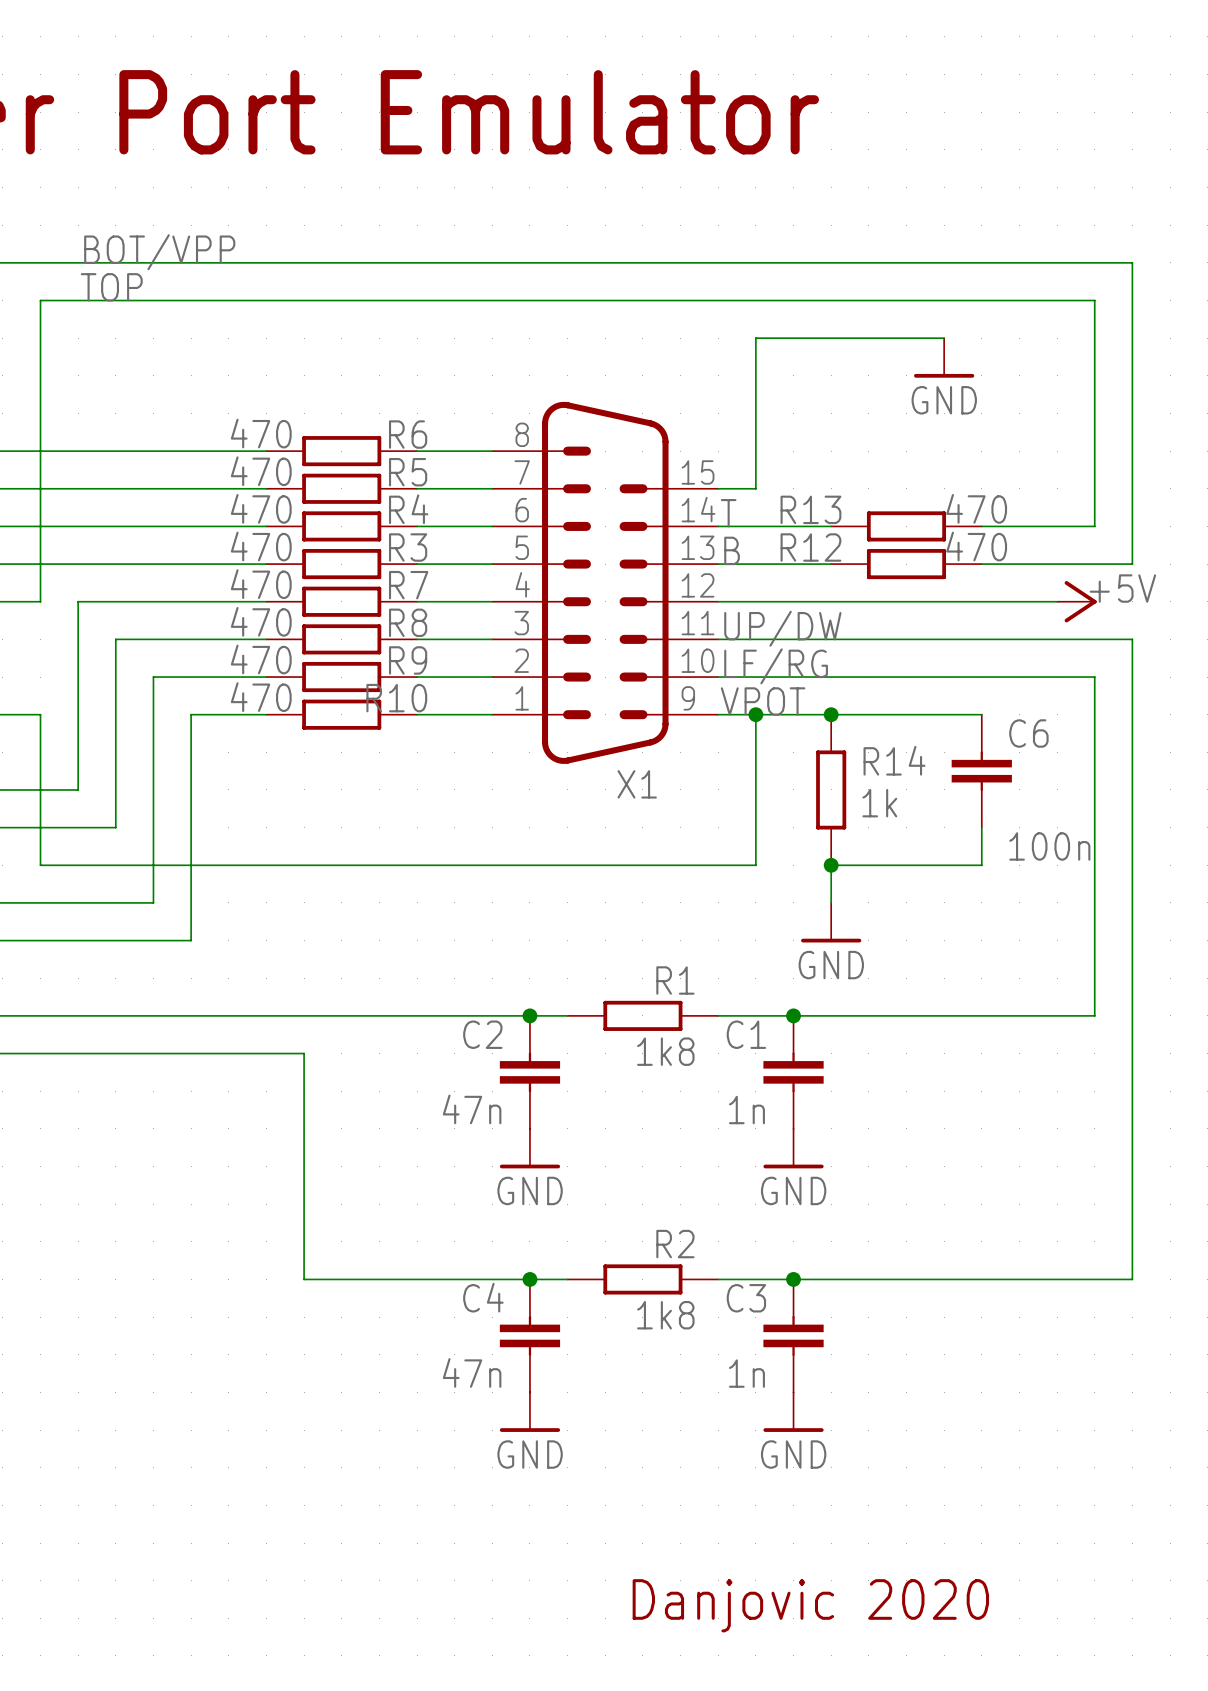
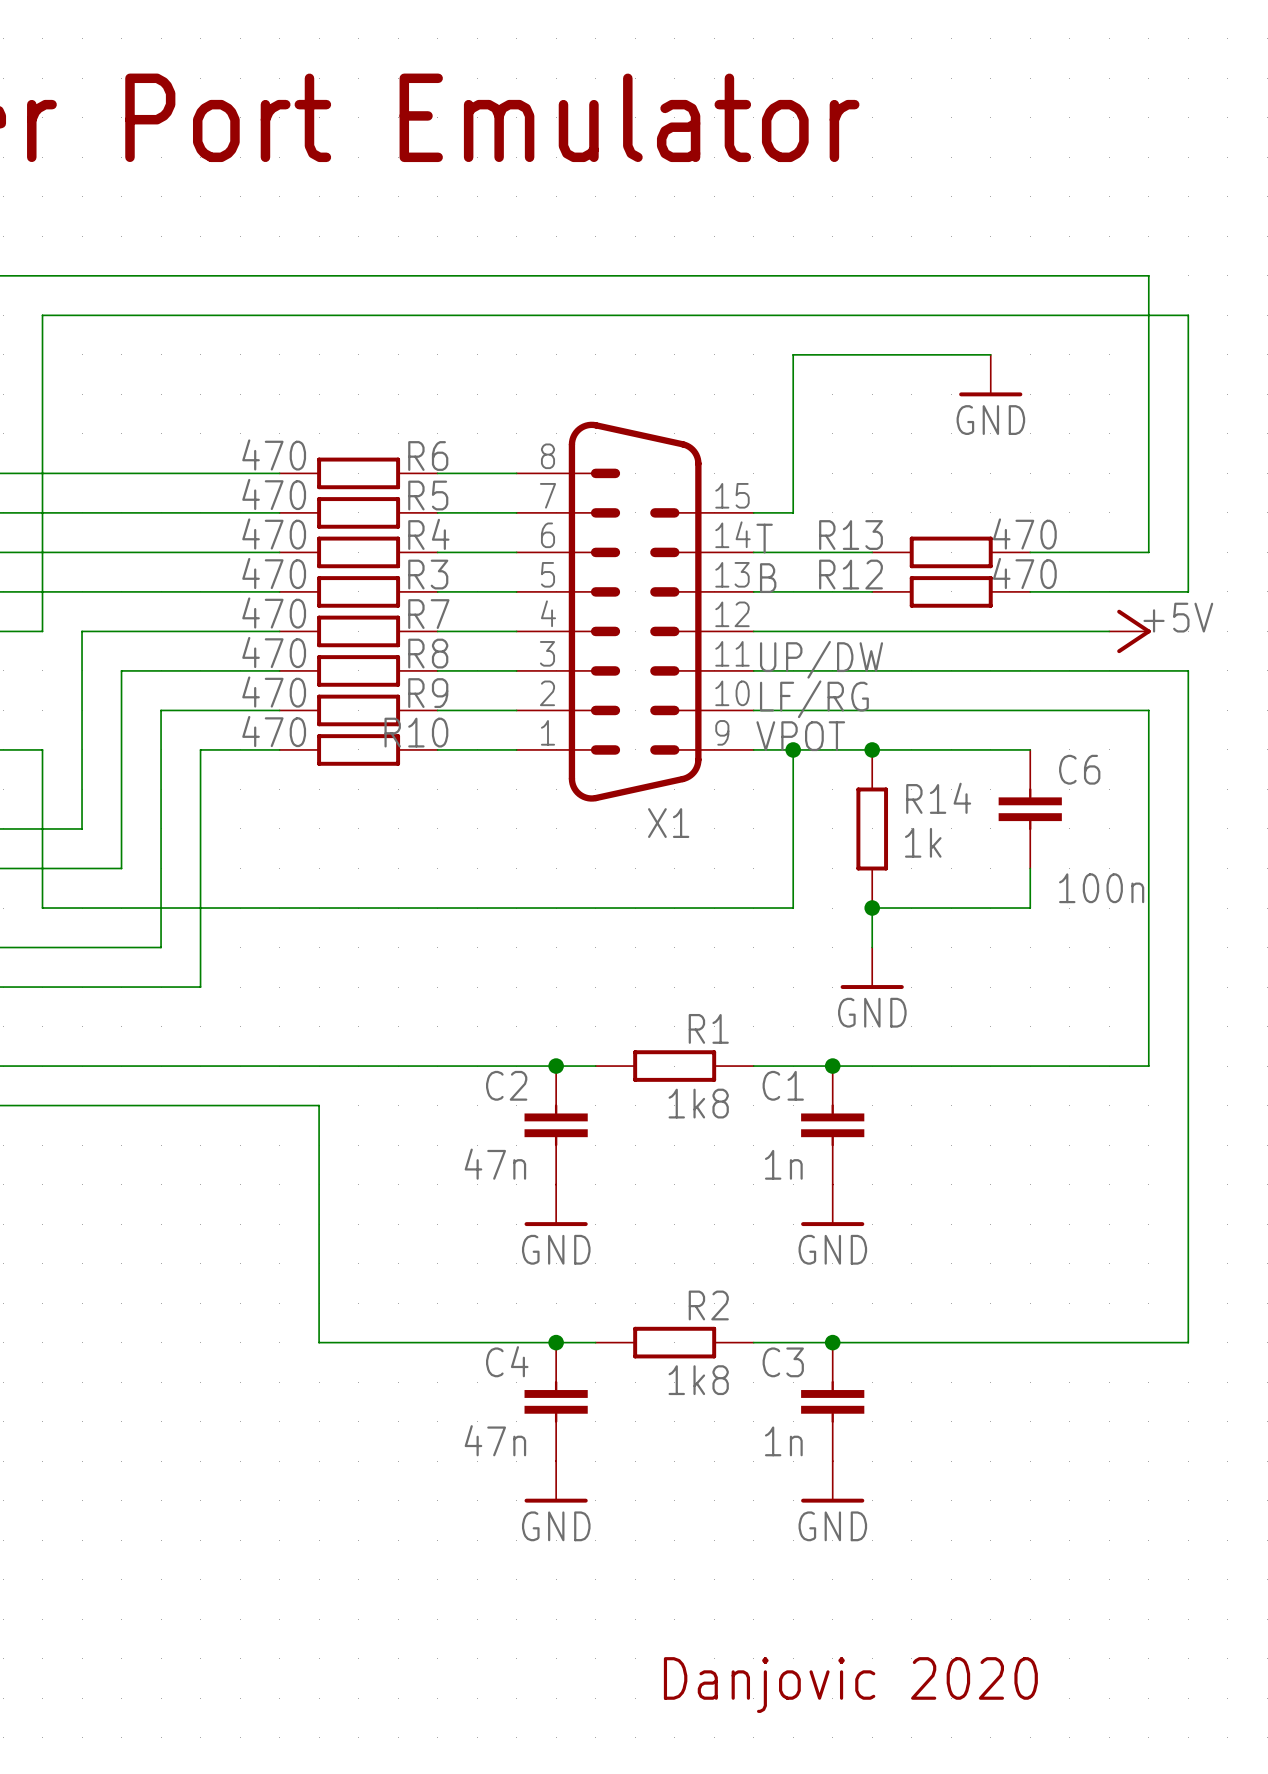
label: BOT/VPP (159, 252) -> none
wire: (1094, 262) (1132, 262) (1132, 300) -> (1148, 275) (1148, 315) (1188, 315)
label: TOP (111, 287) -> none

